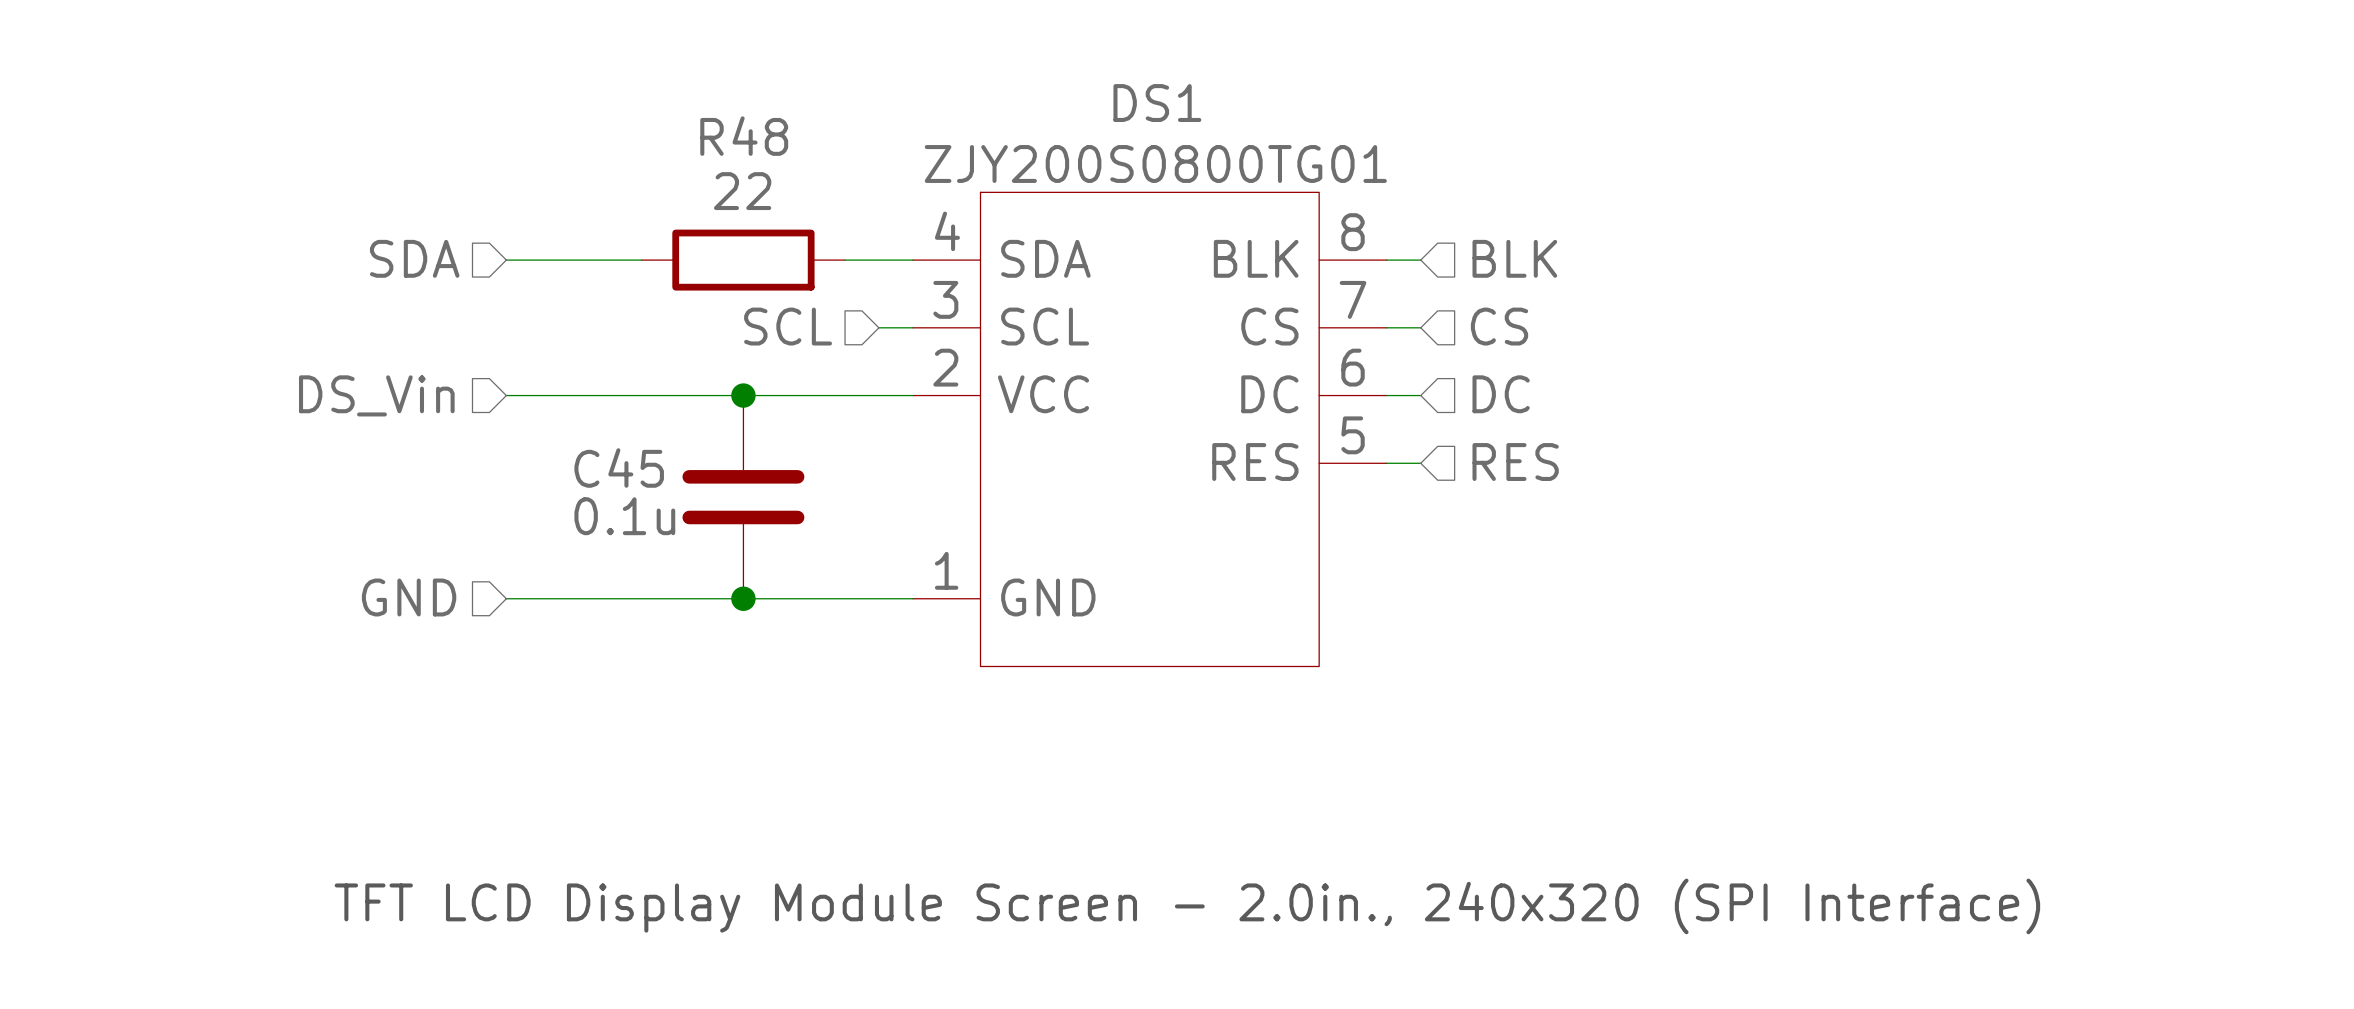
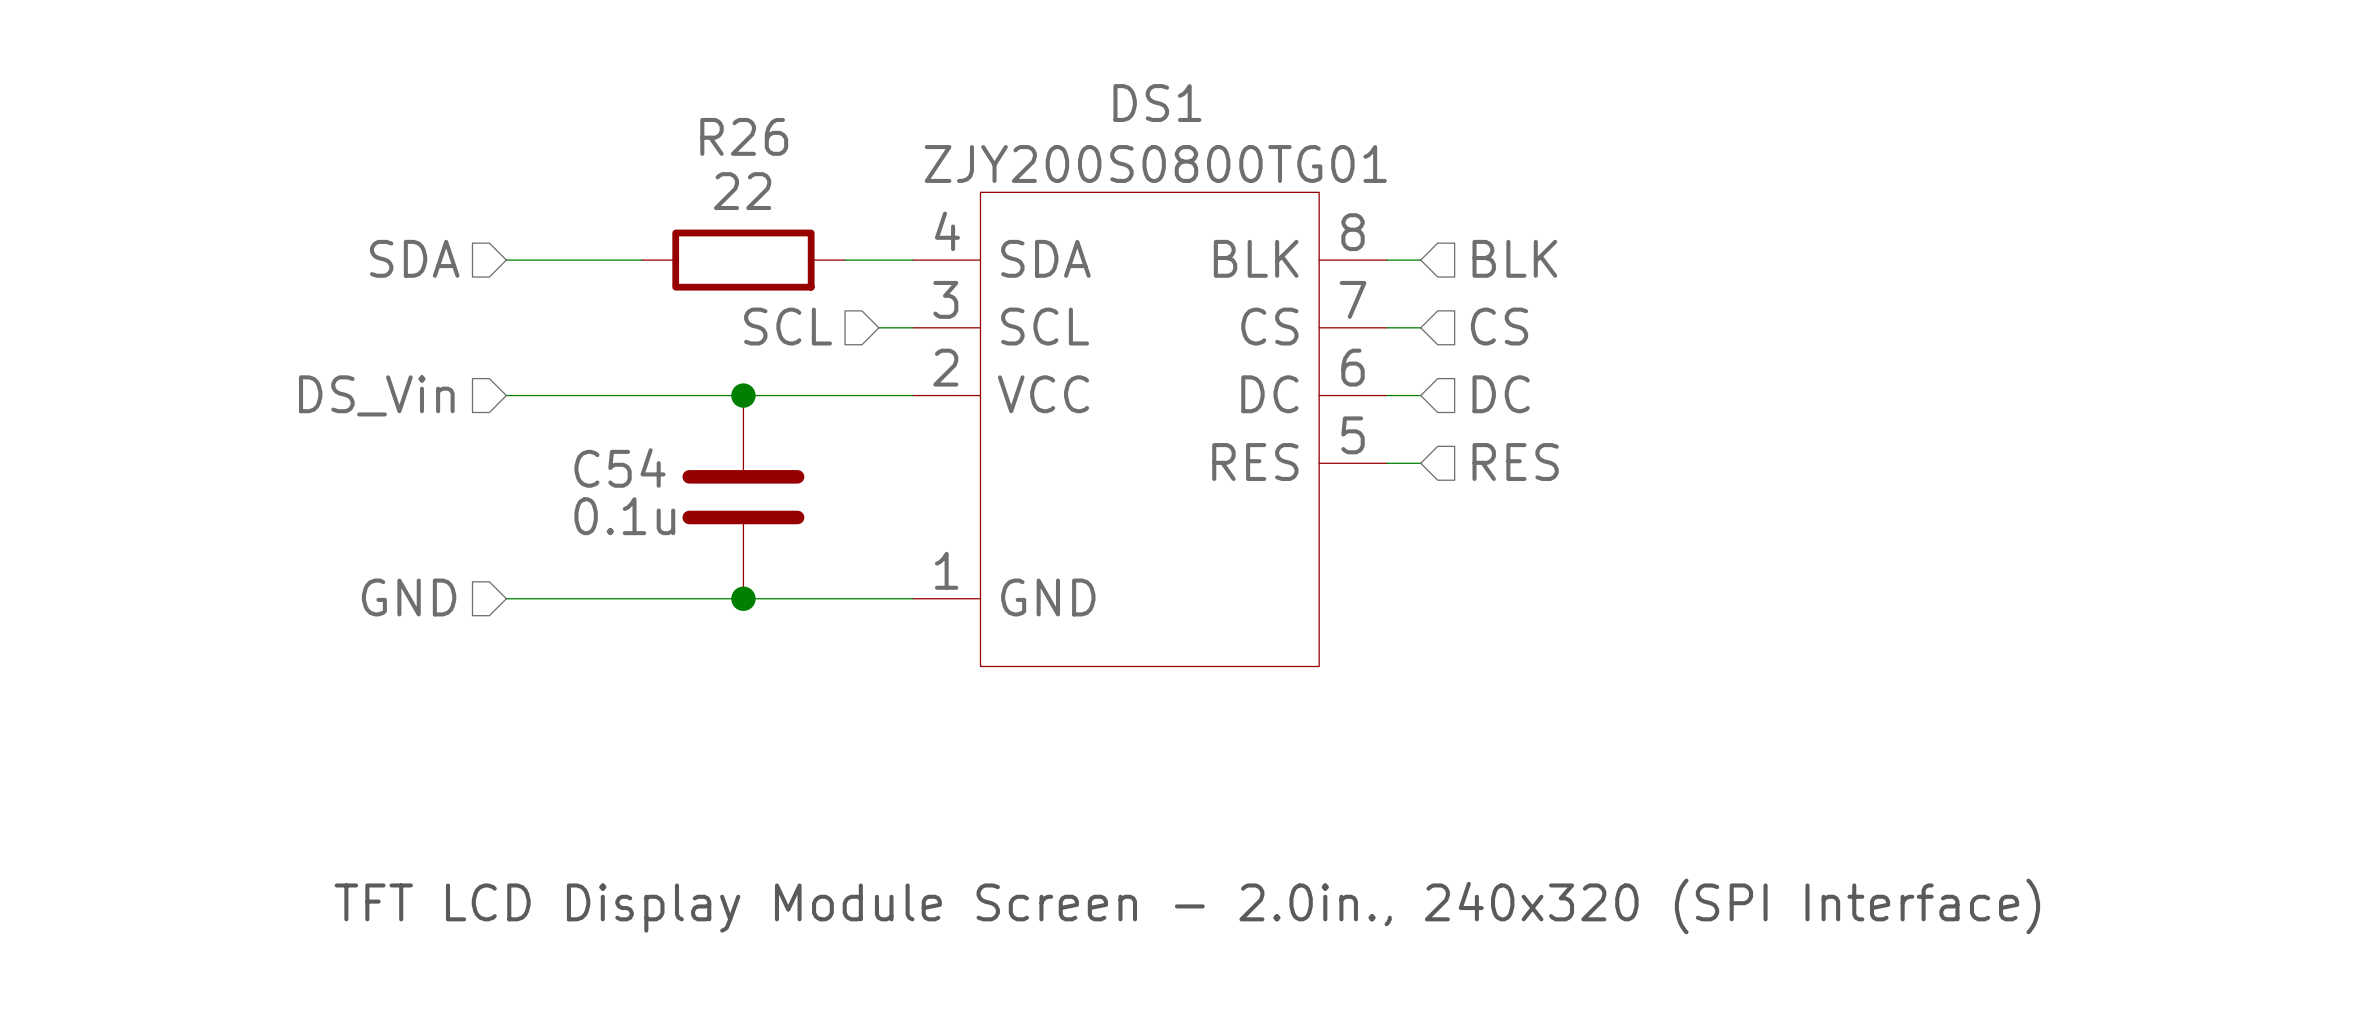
R48 name: R48 (744, 136) -> R26 (744, 136)
C45 name: C45 (619, 467) -> C54 (619, 467)

